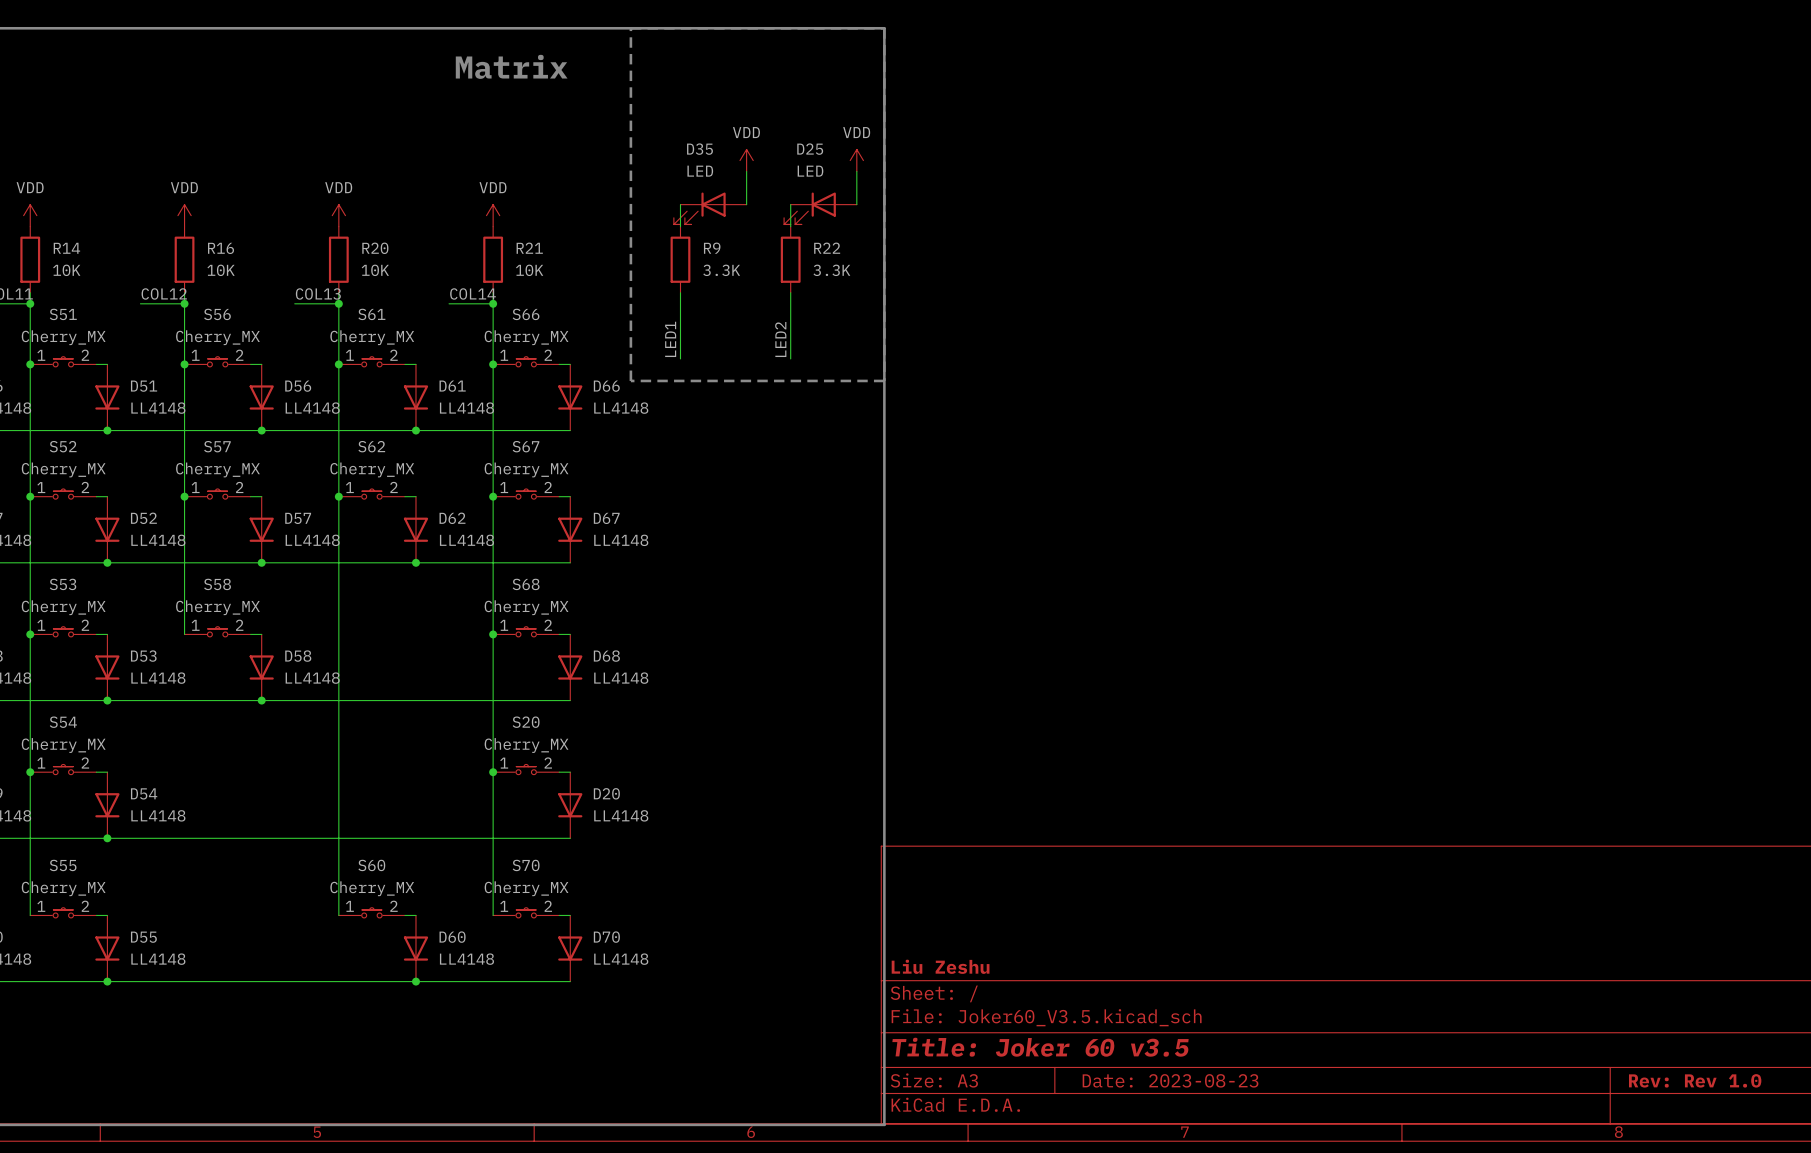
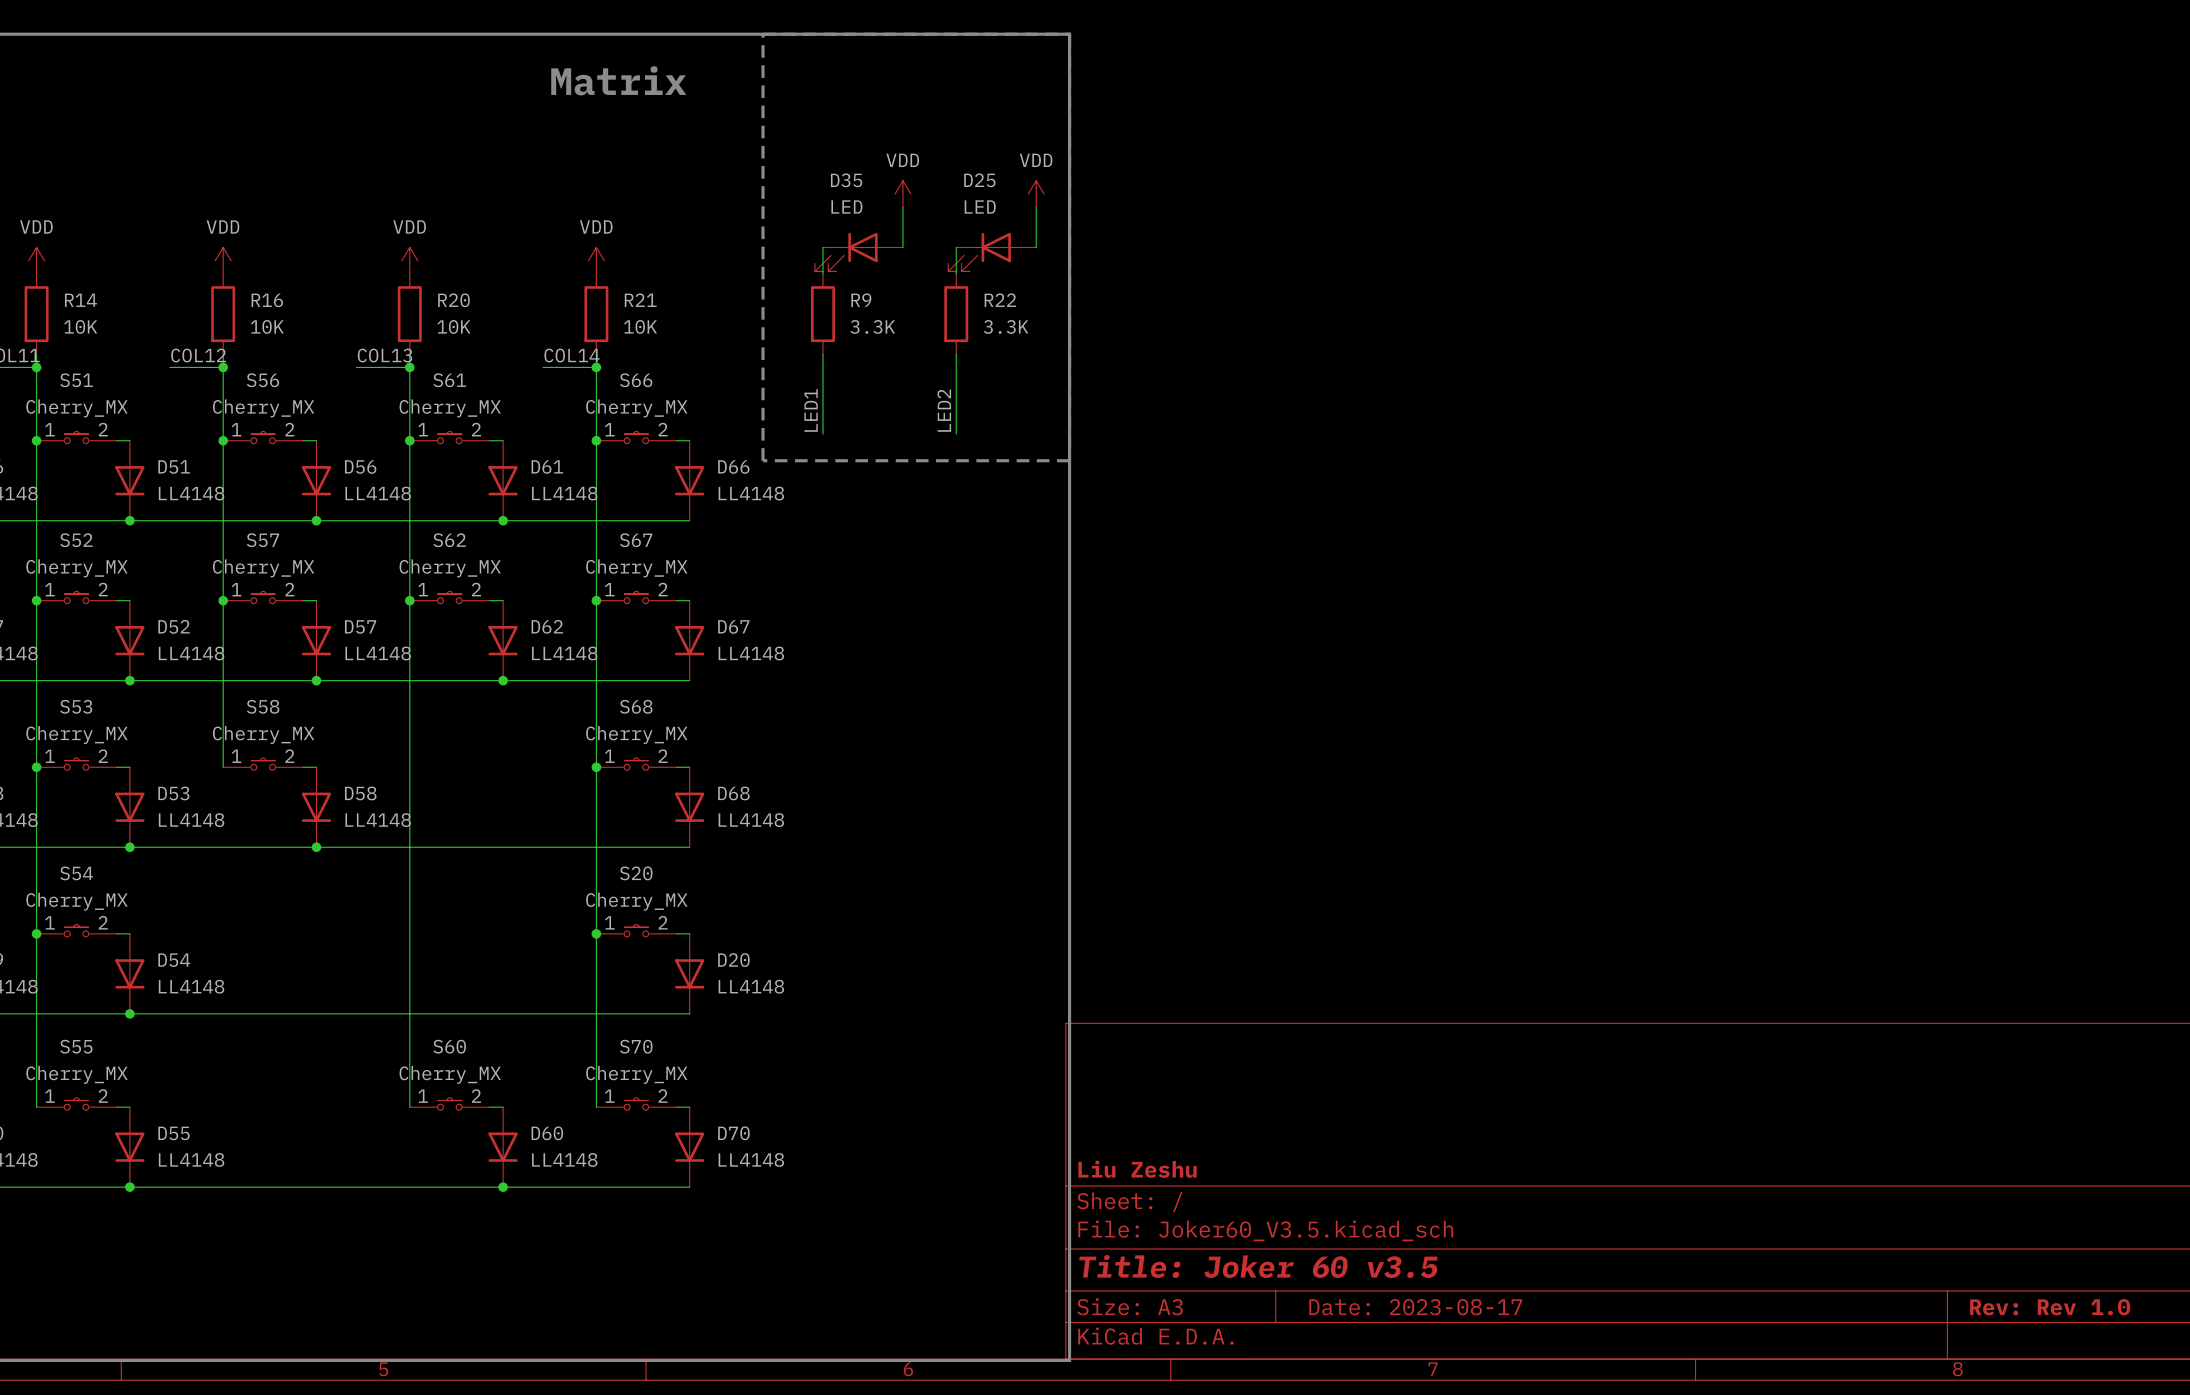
title block: Date: 2023-08-23 (1170, 1080) -> Date: 2023-08-17 (1415, 1307)

